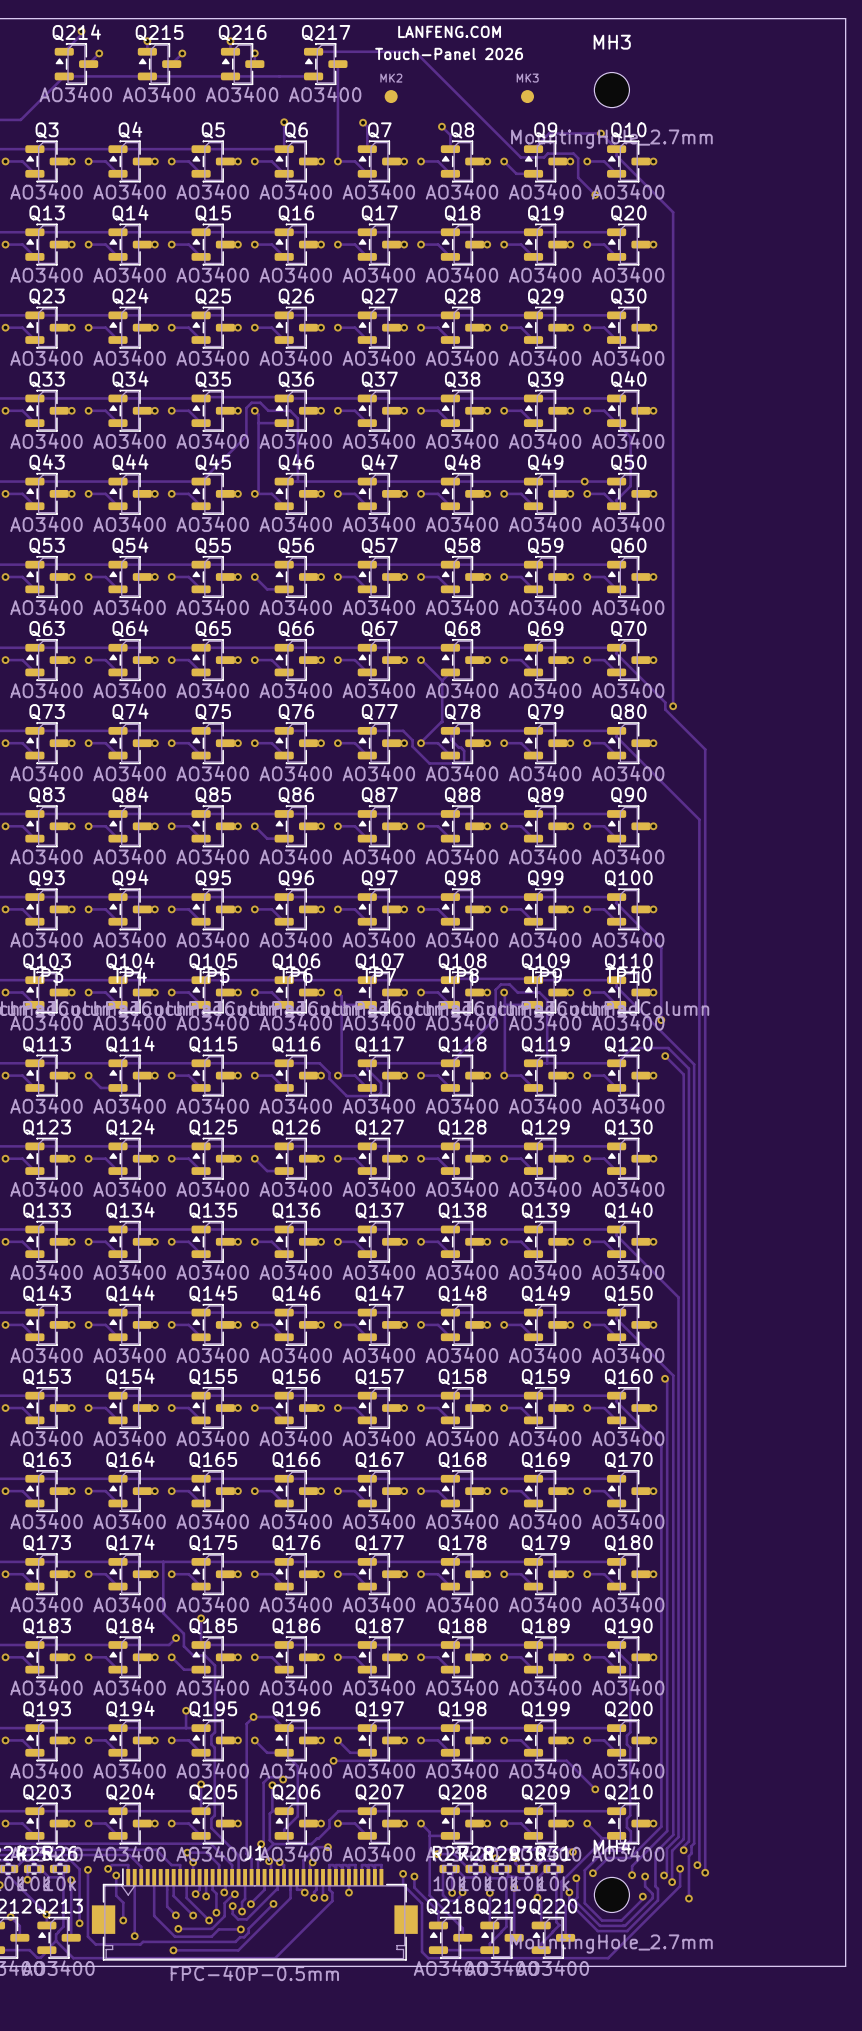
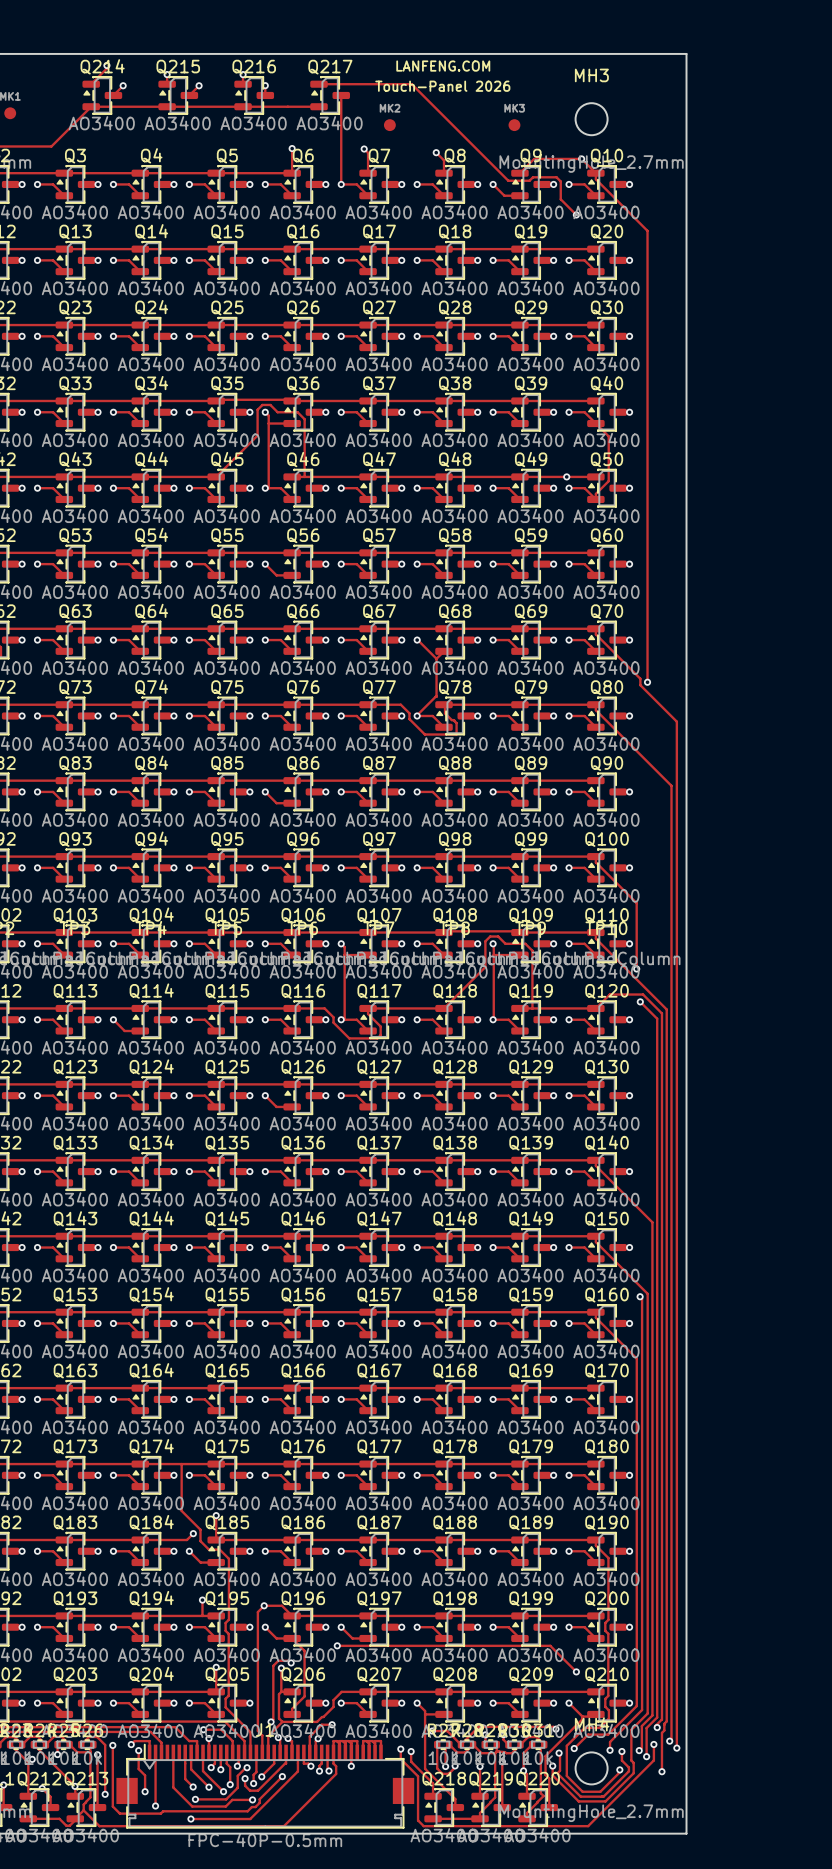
board edge: (715, 18) (845, 18) (845, 1966) (715, 1966) -> (686, 53) (686, 1833)

